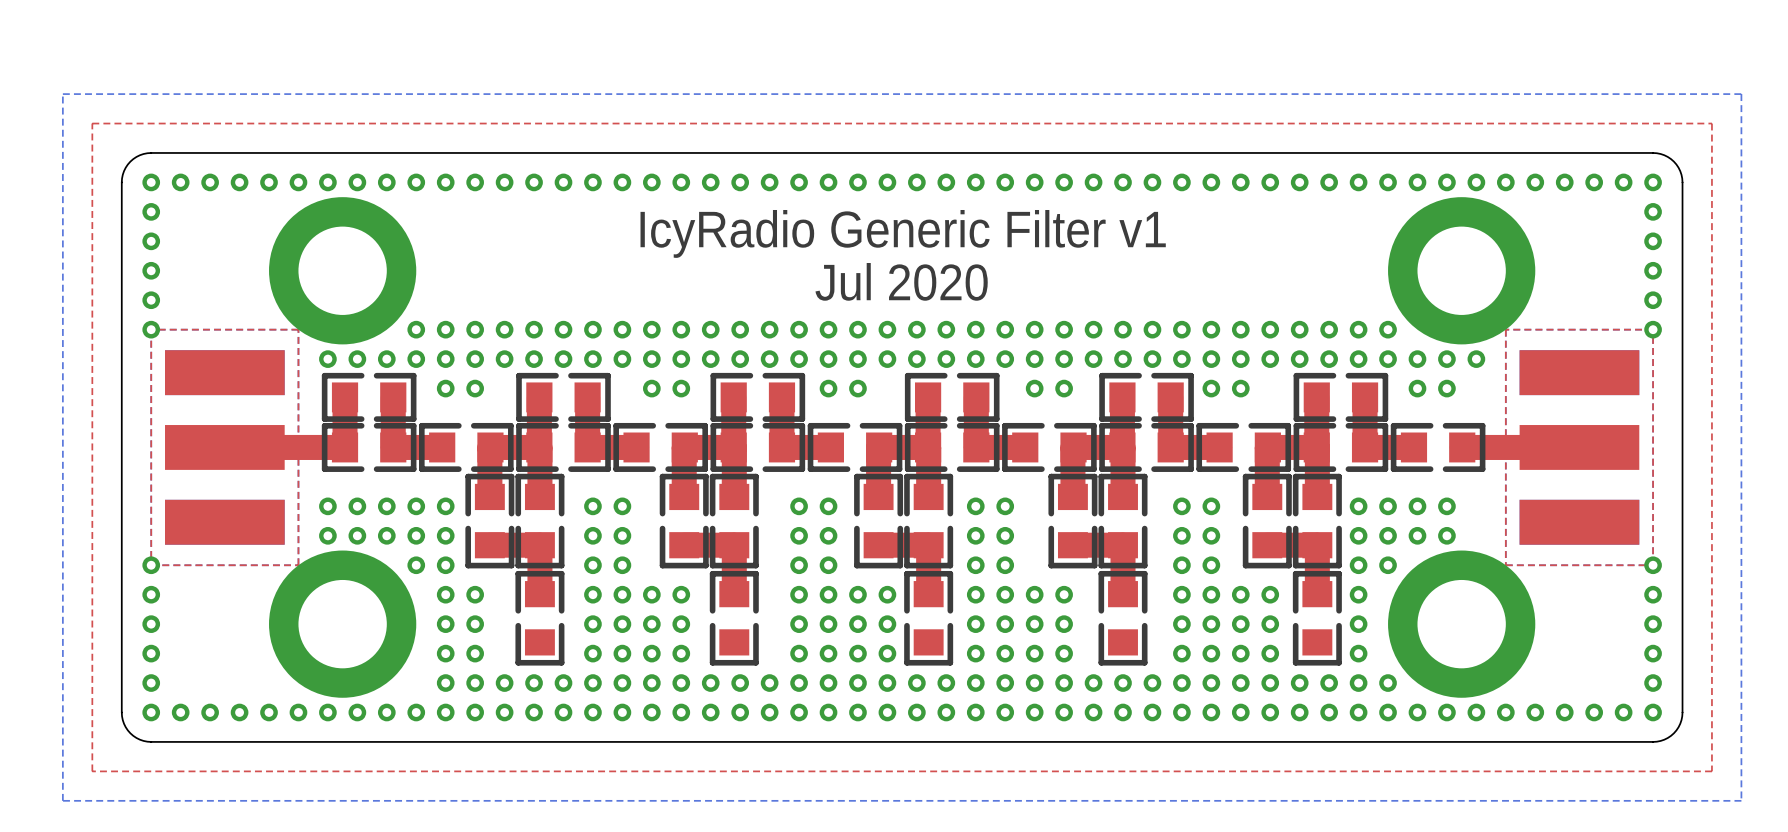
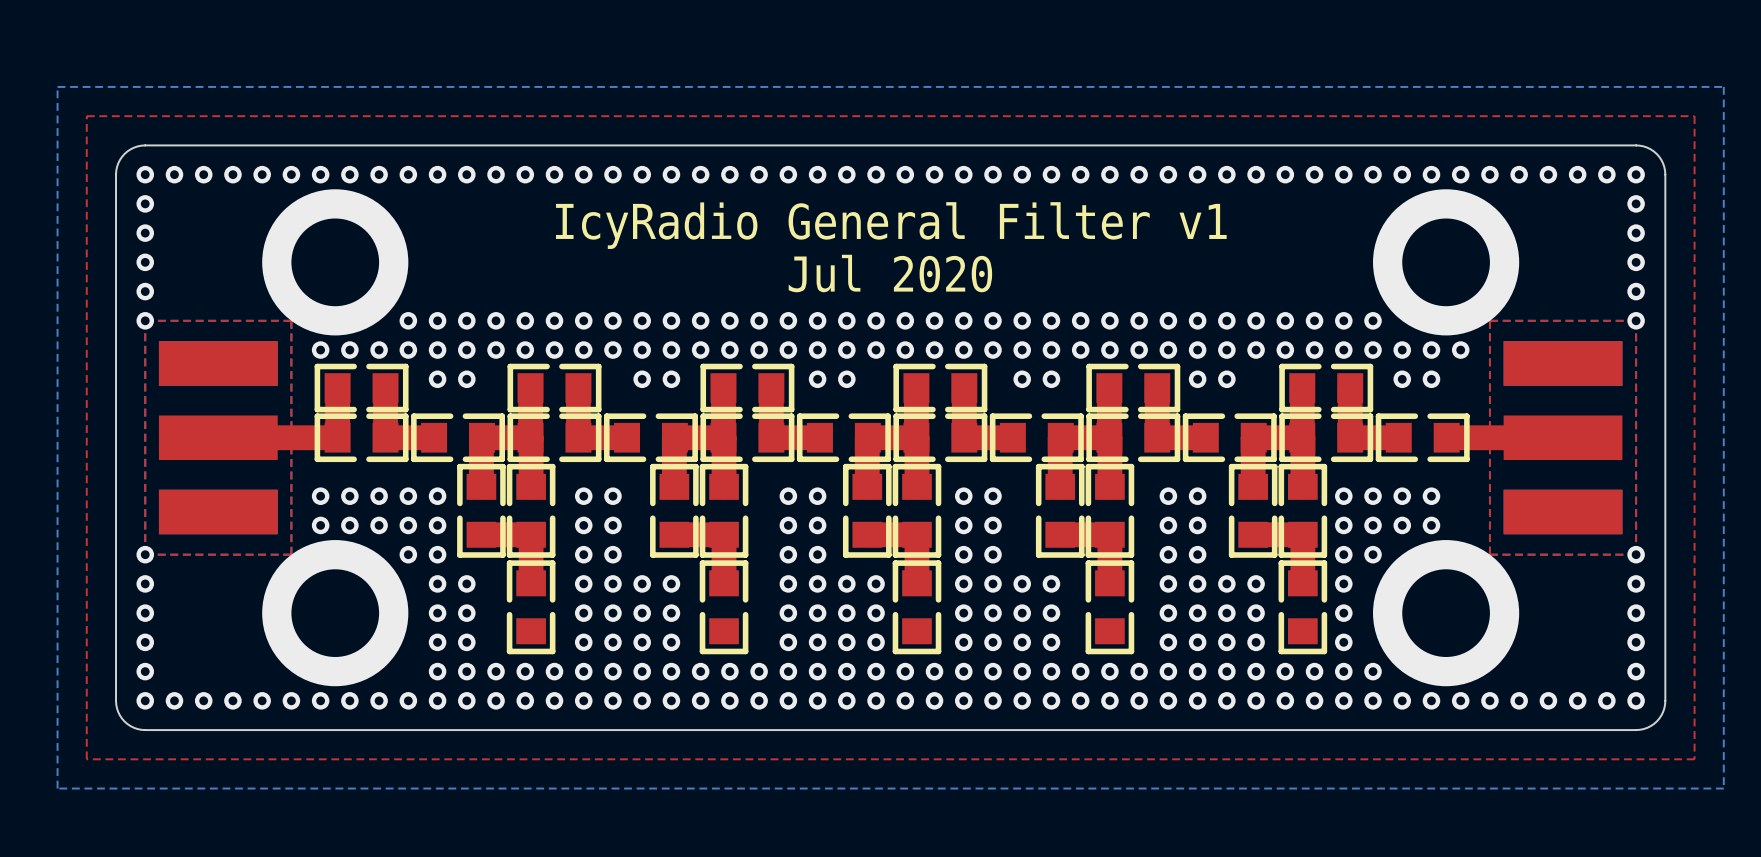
text: IcyRadio Generic Filter v1 (903, 233) -> IcyRadio General Filter v1 (891, 225)

